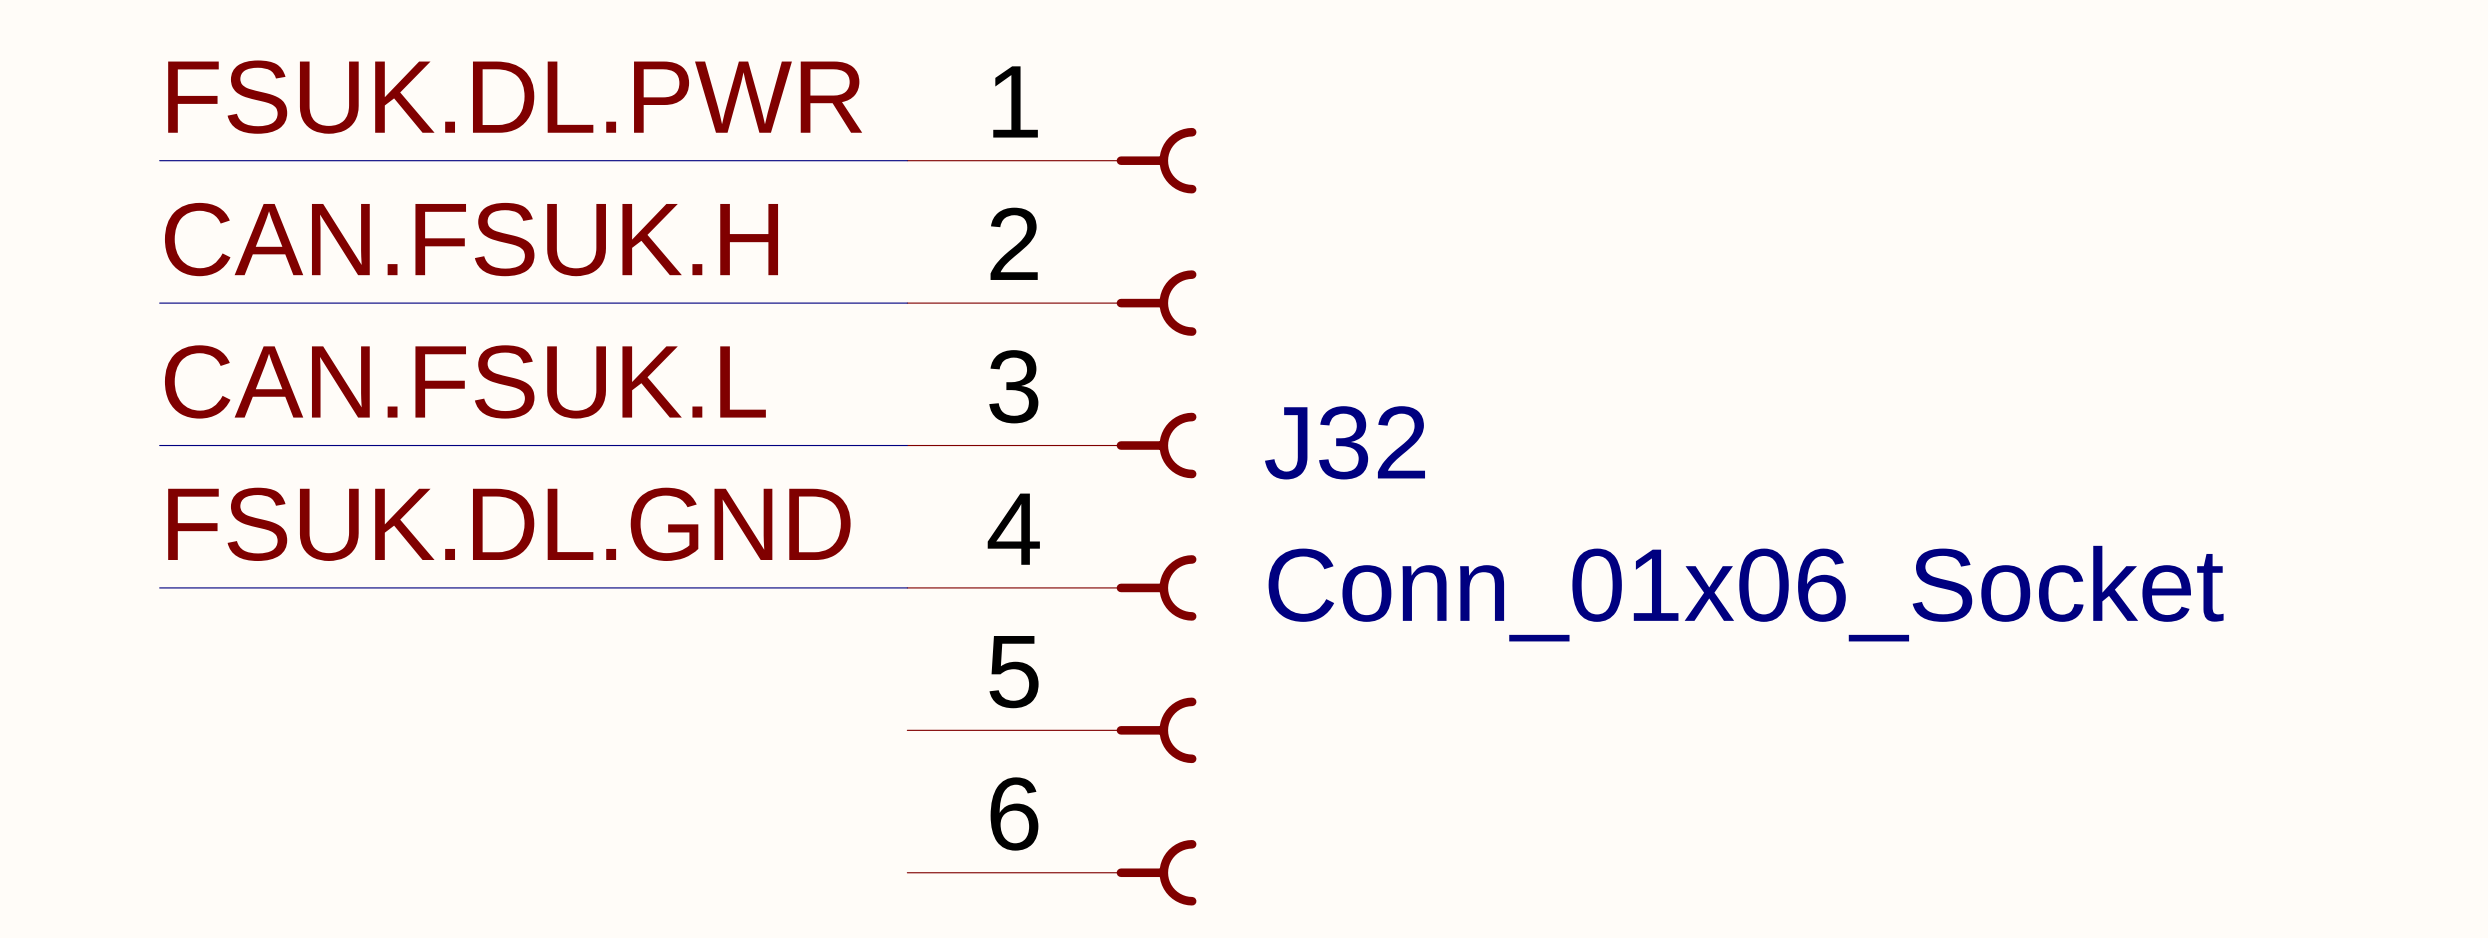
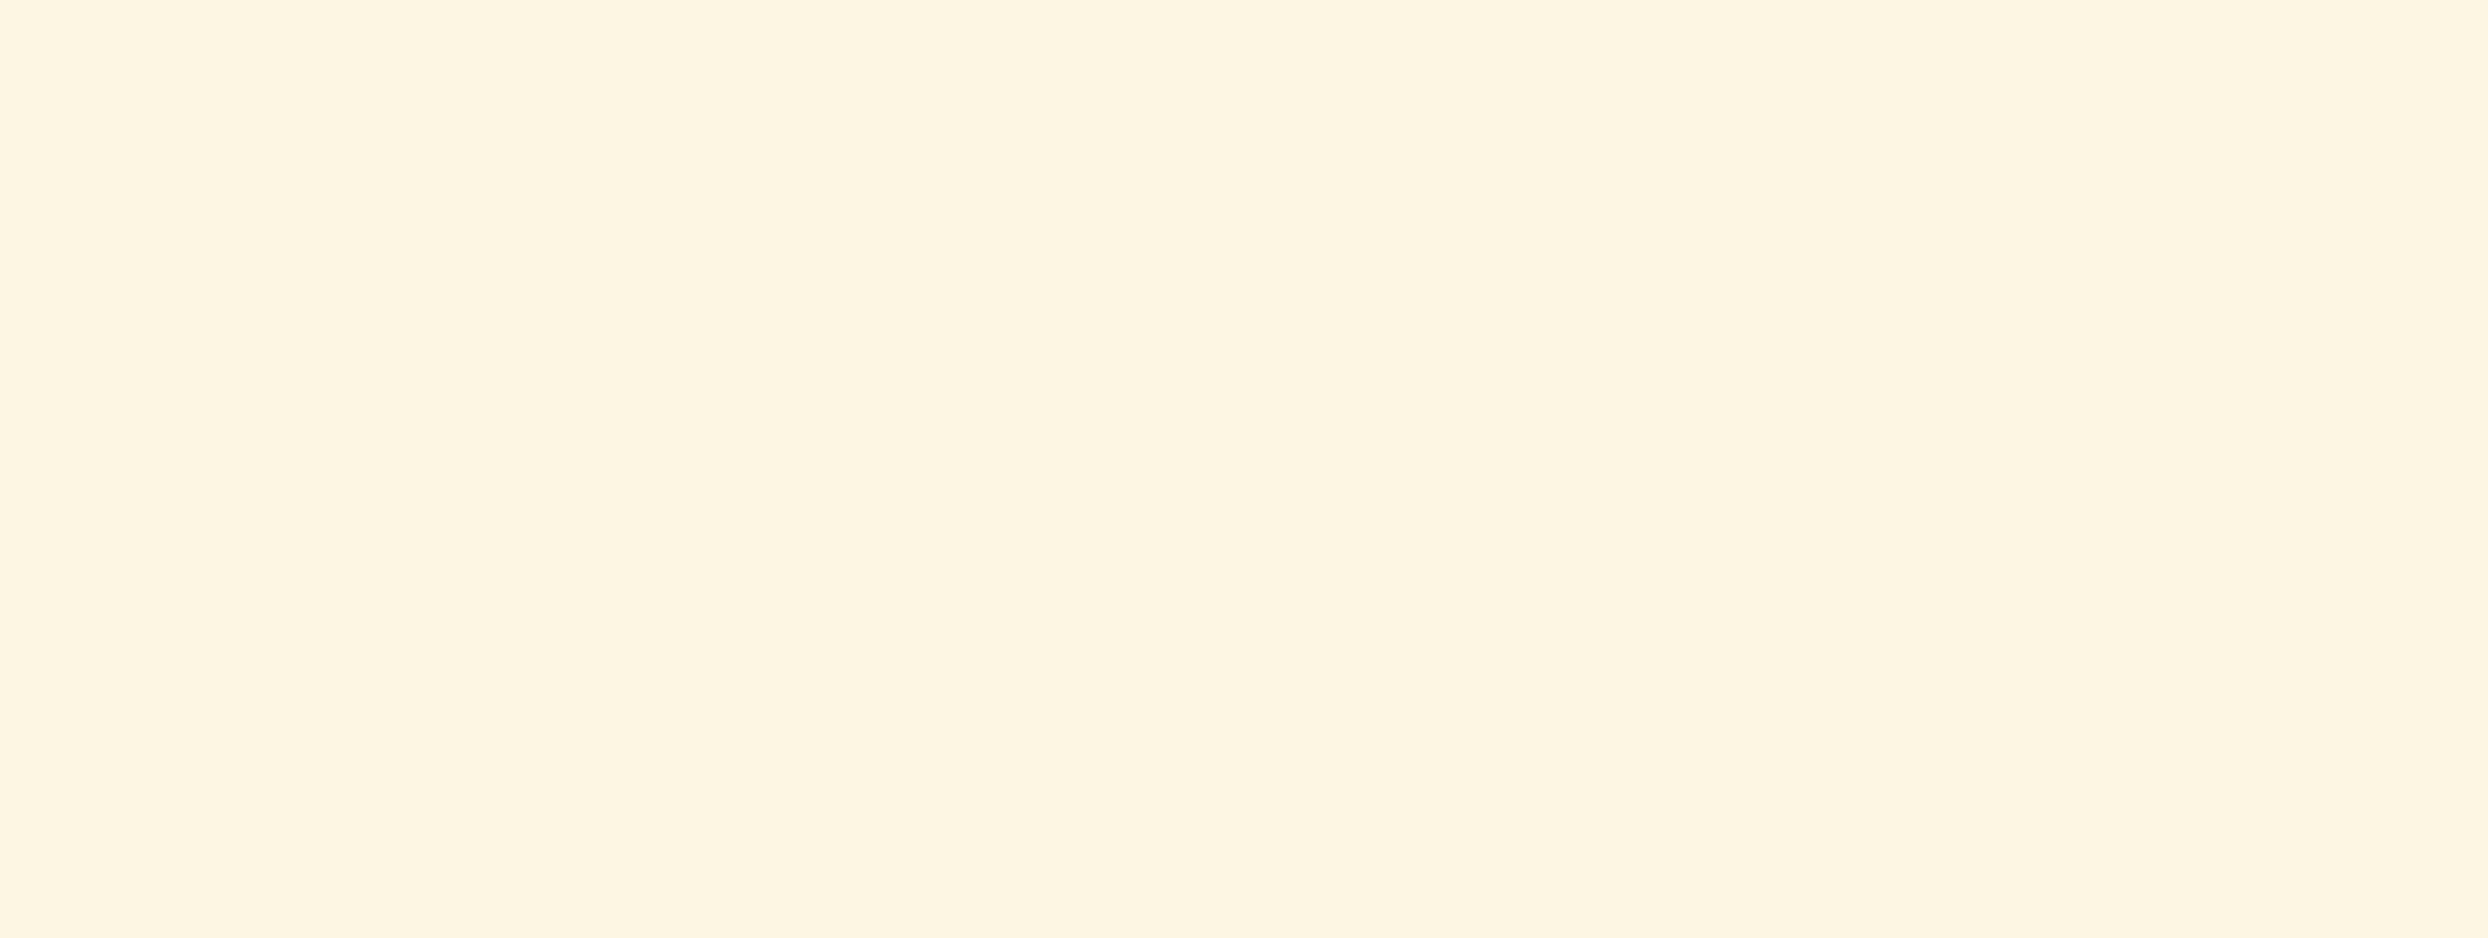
label: FSUK.DL.PWR (515, 97) -> none
wire: (159, 160) (907, 160) -> none
label: CAN.FSUK.H (471, 239) -> none
wire: (159, 303) (907, 303) -> none
label: CAN.FSUK.L (465, 381) -> none
wire: (159, 445) (907, 445) -> none
J32: Conn_01x06_Socket (1051, 516) -> none
label: FSUK.DL.GND (509, 524) -> none
wire: (159, 587) (907, 587) -> none

